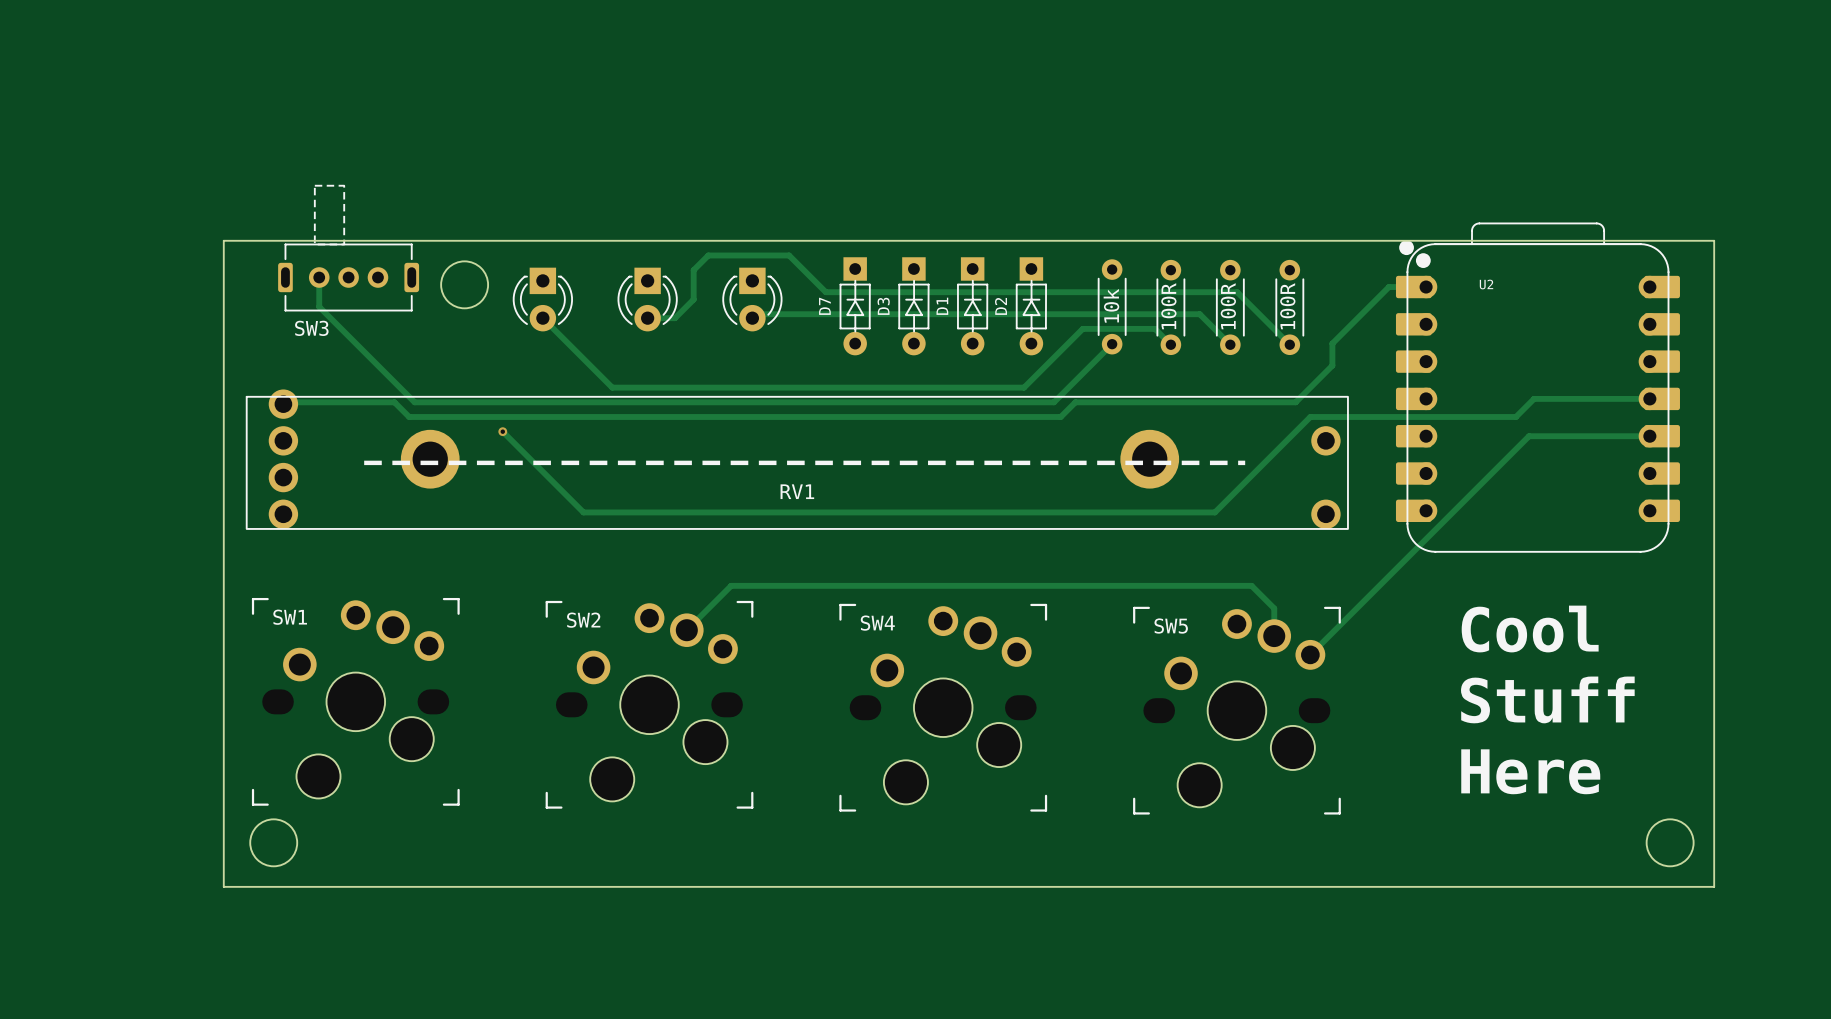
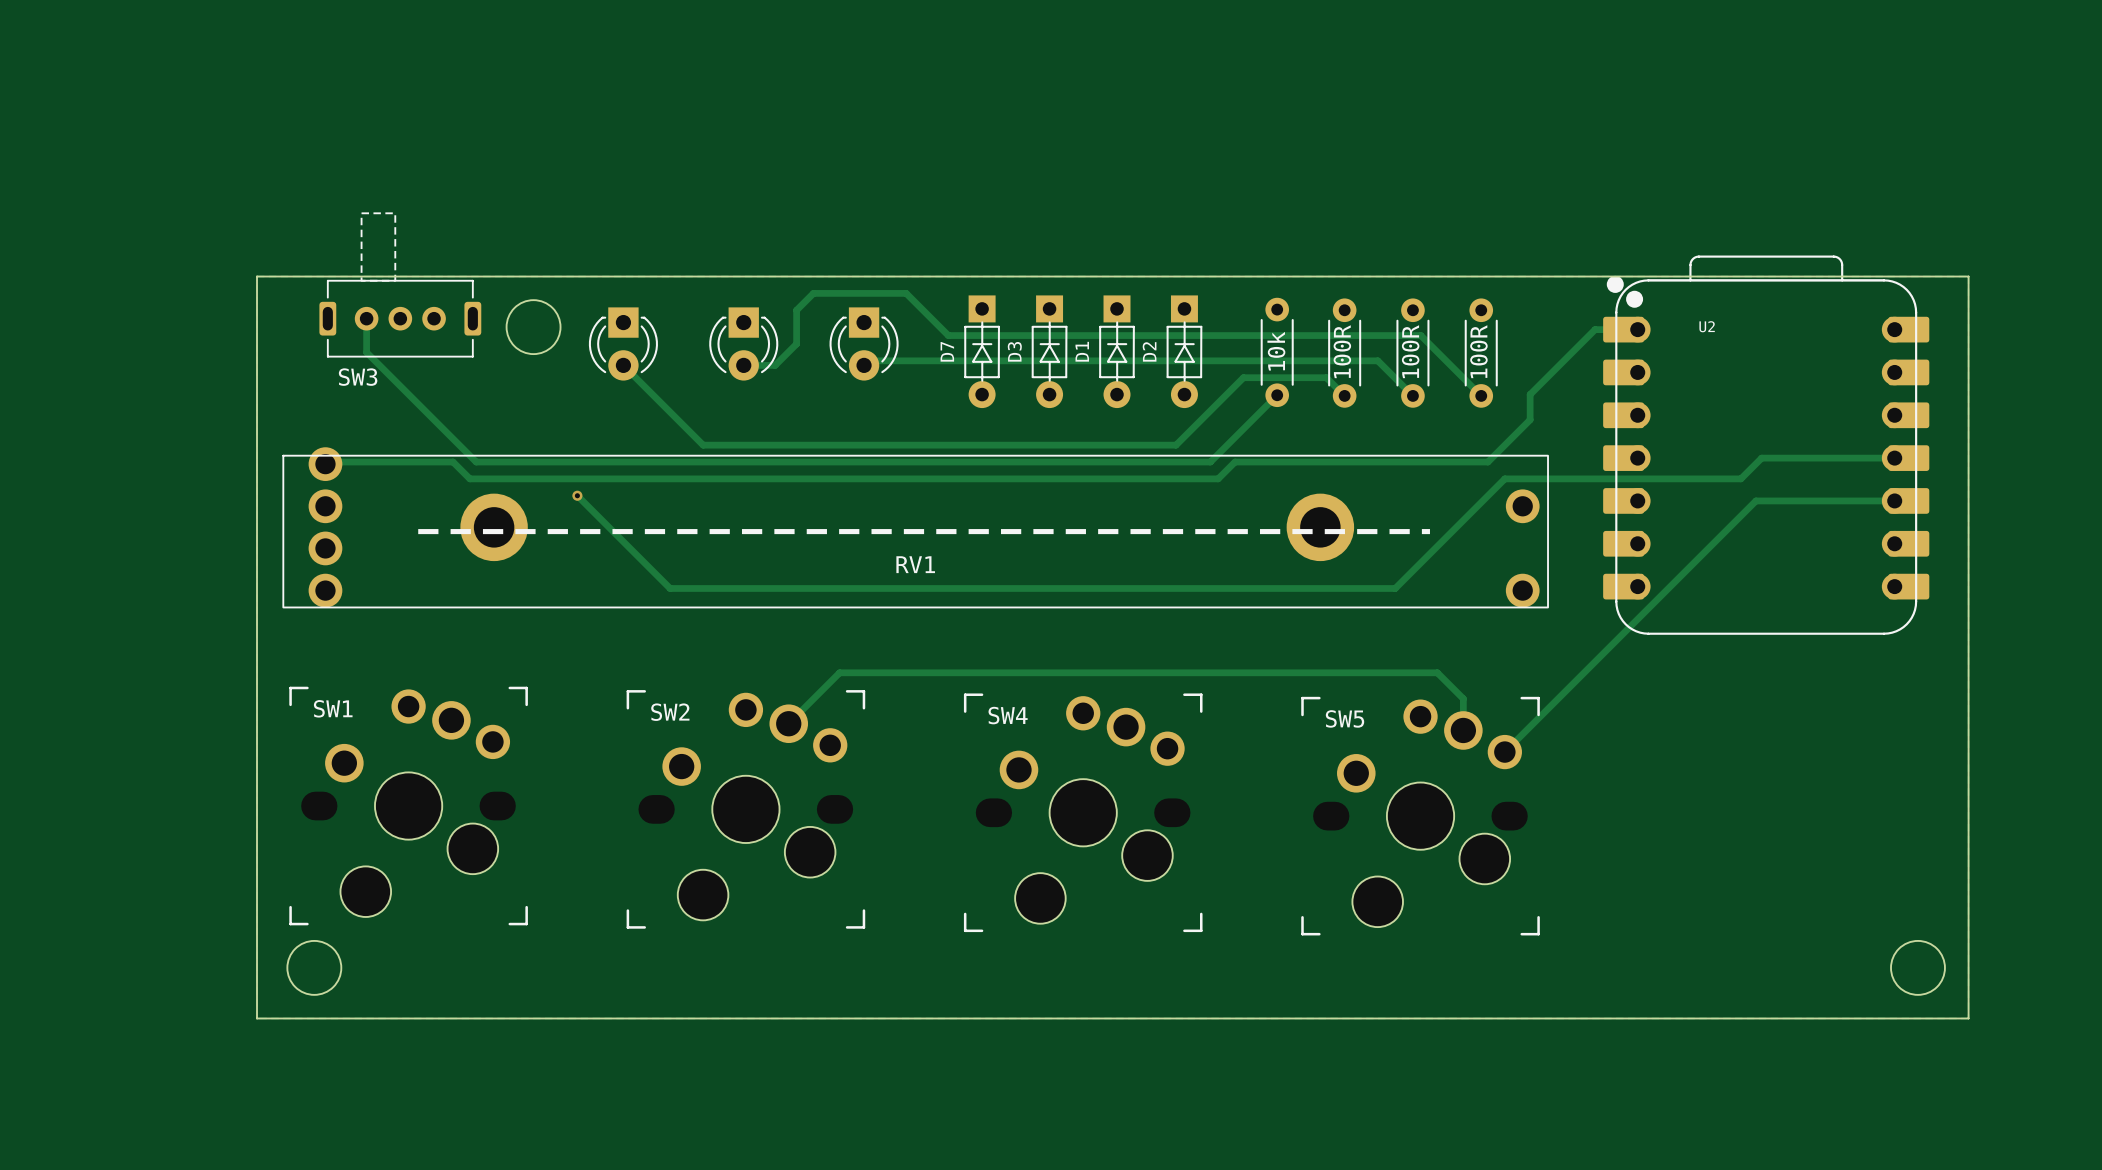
text: Cool (1530, 629) -> none
text: Stuff (1547, 699) -> none
text: Here (1530, 771) -> none

